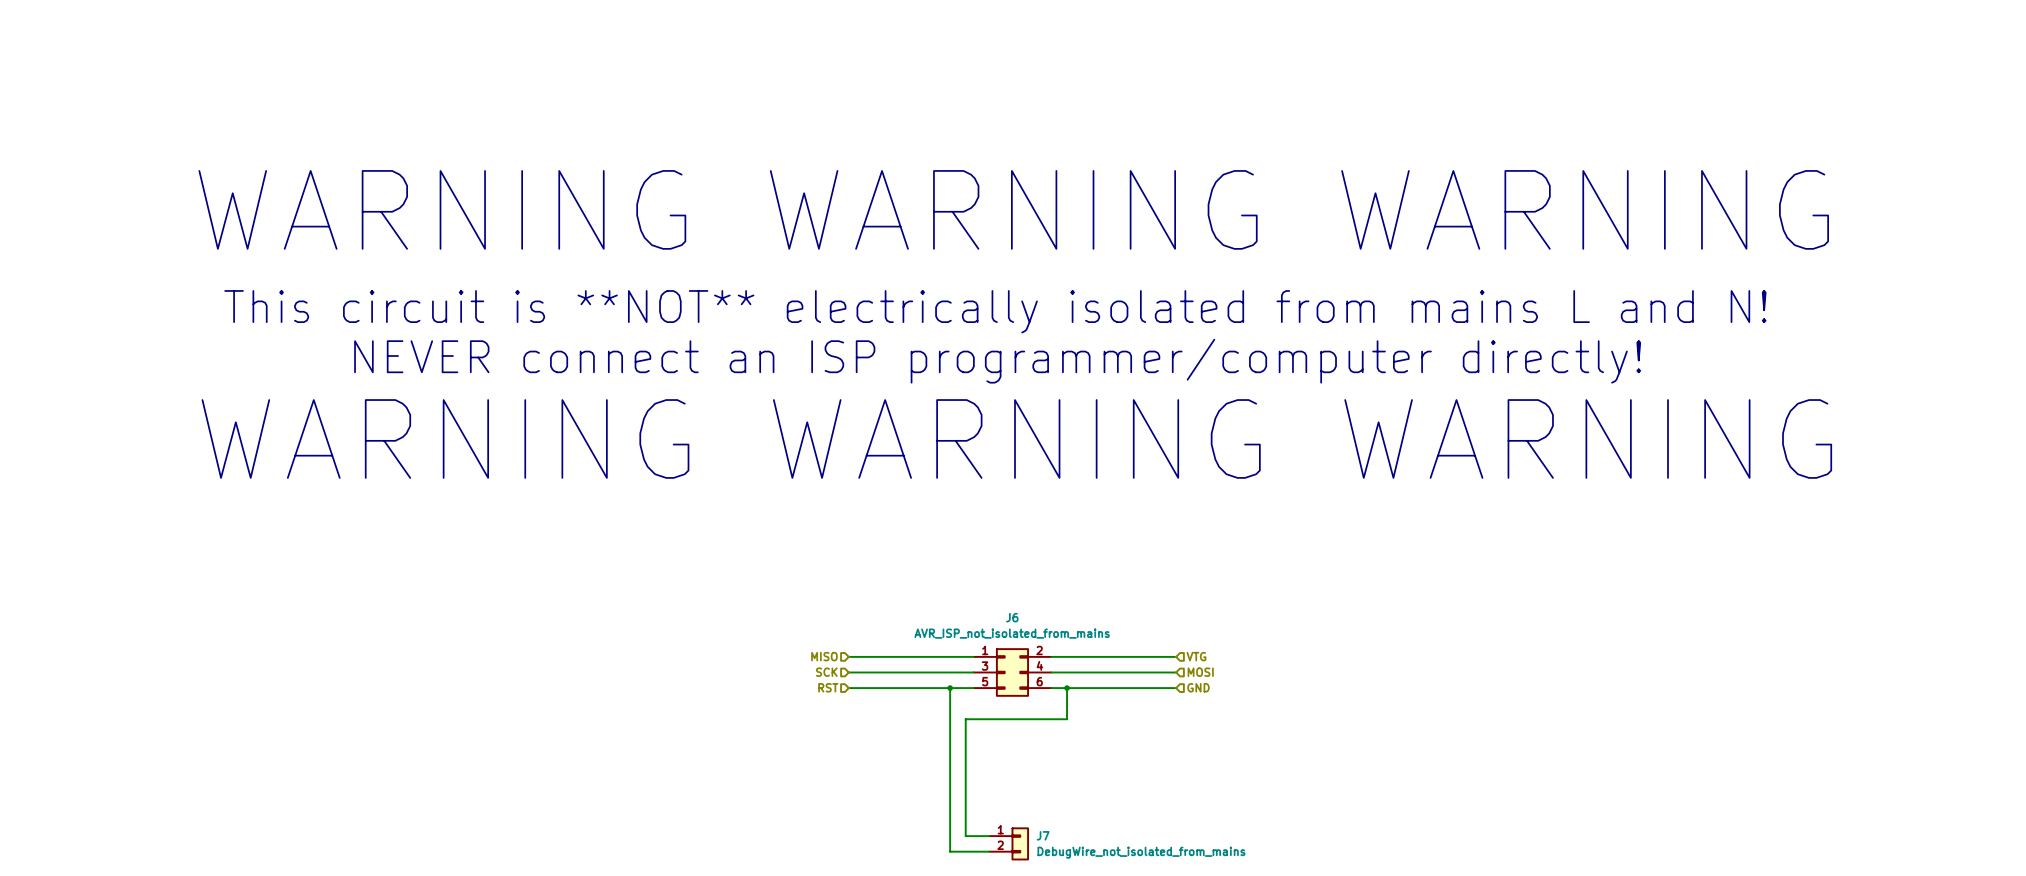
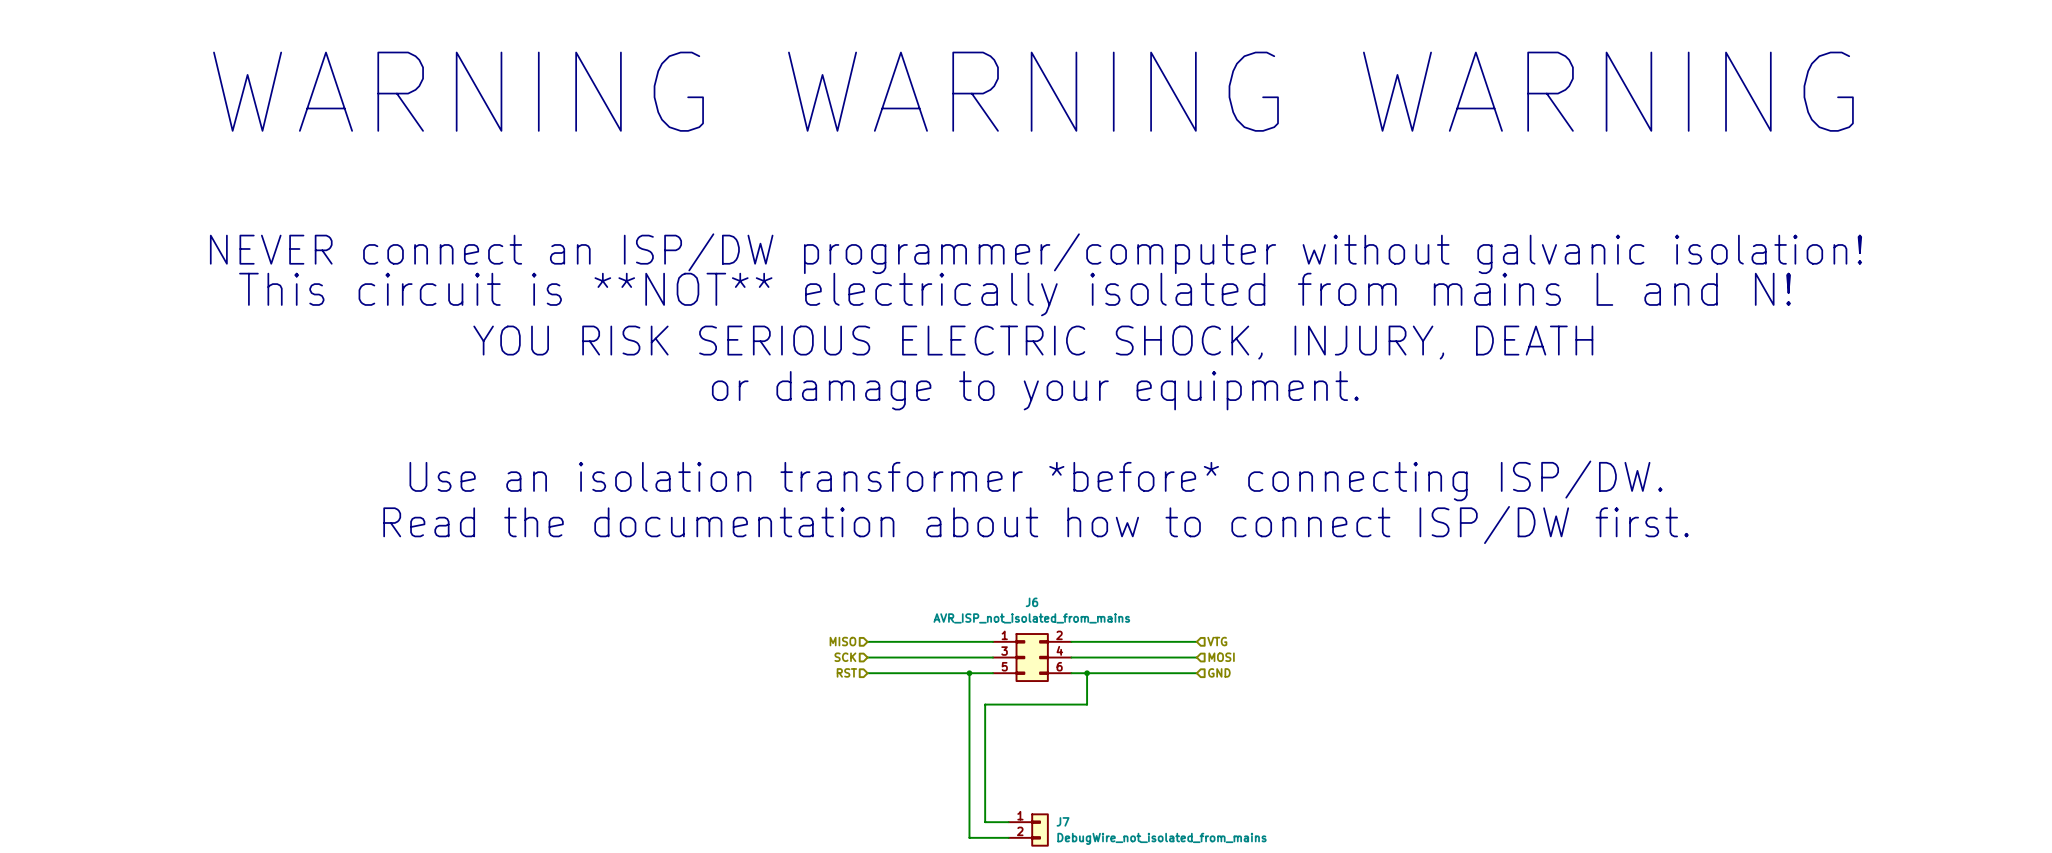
text position: WARNING WARNING WARNING (1013, 209) -> WARNING WARNING WARNING (1033, 91)
text: none -> NEVER connect an ISP/DW programmer/computer without galvanic isolation! (1036, 253)
text: none -> YOU RISK SERIOUS ELECTRIC SHOCK, INJURY, DEATH (1033, 342)
text: NEVER connect an ISP programmer/computer directly! (997, 361) -> none
text: none -> or damage to your equipment. (1035, 390)
text: WARNING WARNING WARNING (1016, 438) -> none
text: none -> Use an isolation transformer *before* connecting ISP/DW. (1036, 480)
text: none -> Read the documentation about how to connect ISP/DW first. (1036, 525)

